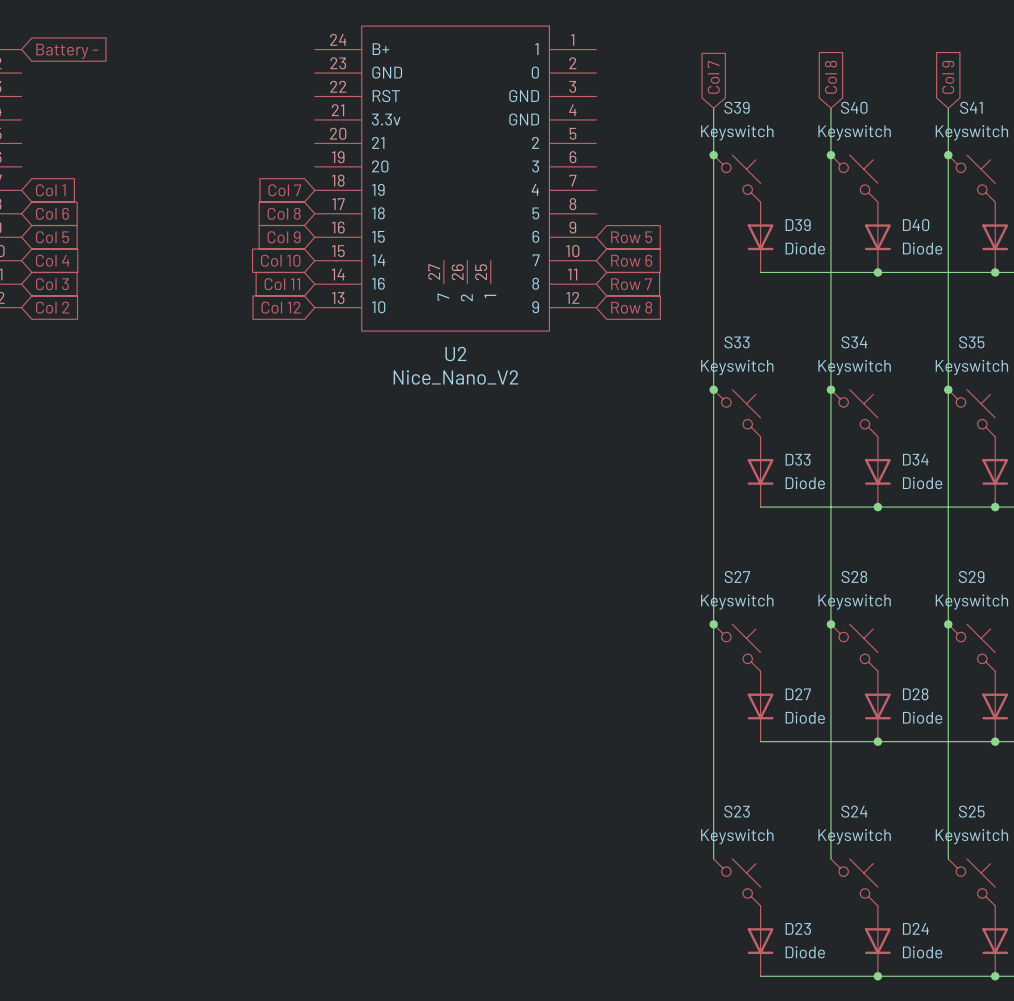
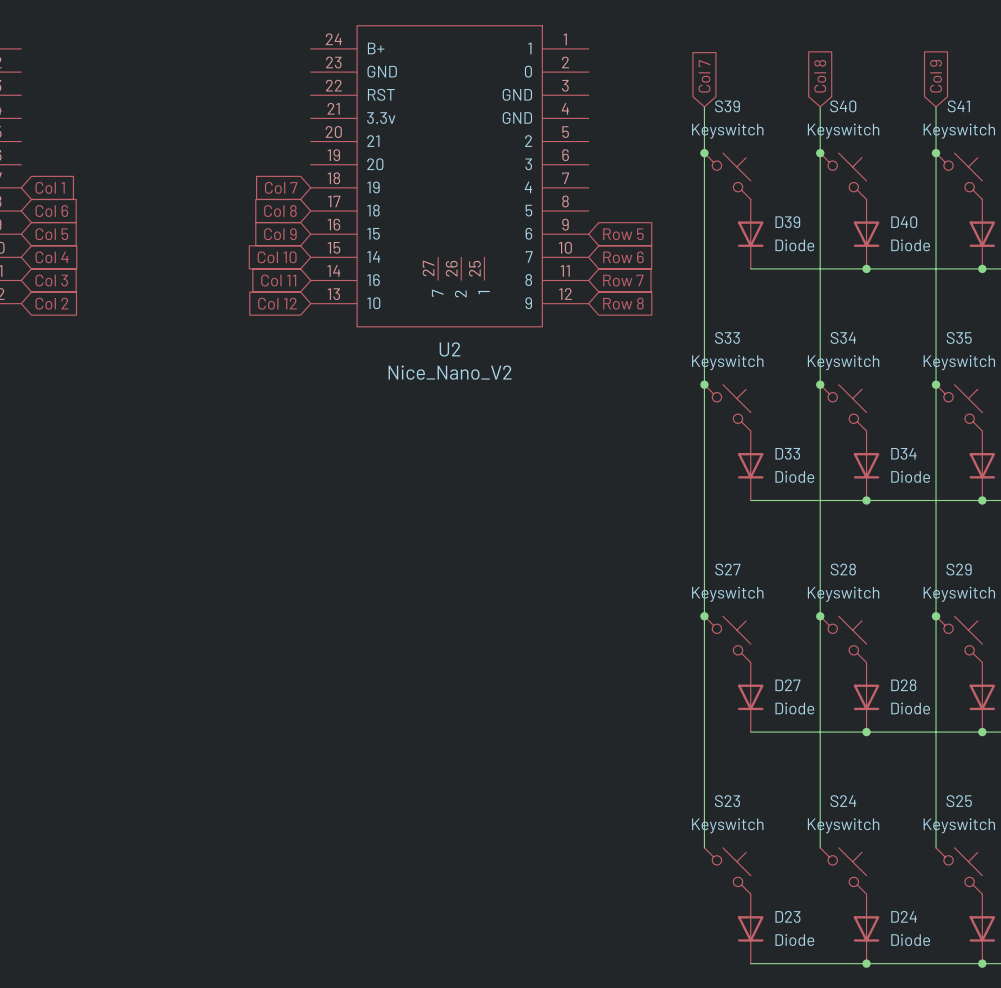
global label: Battery - (67, 51) -> none

